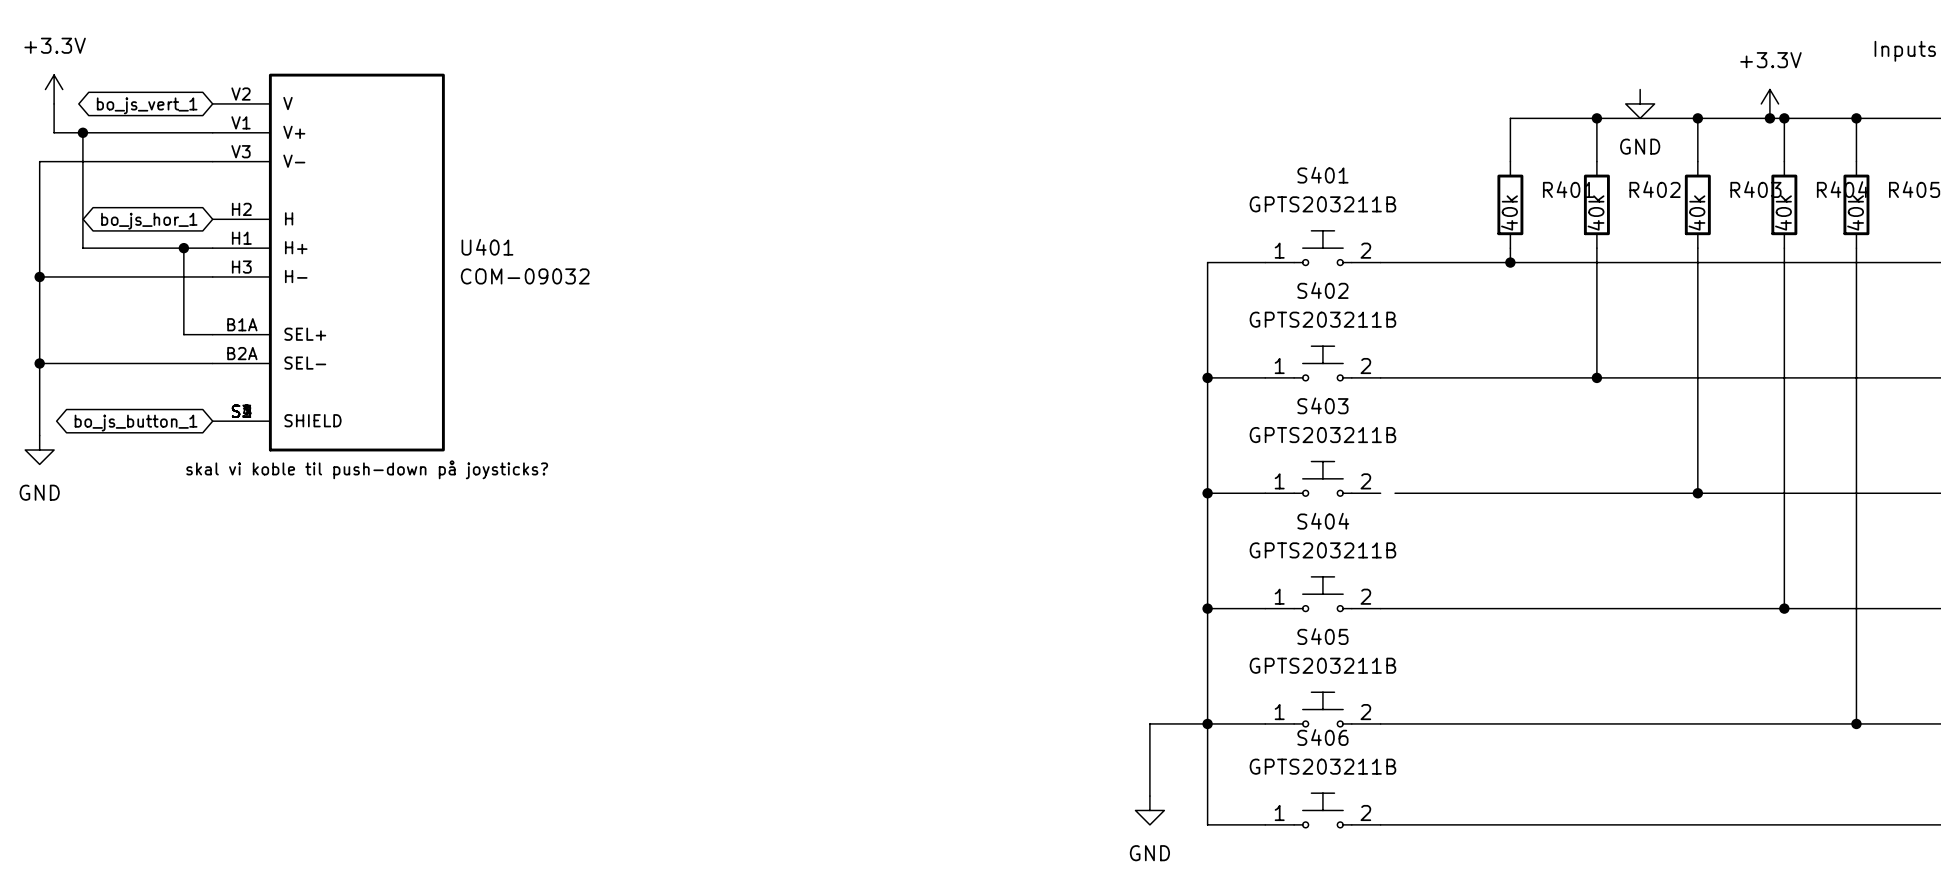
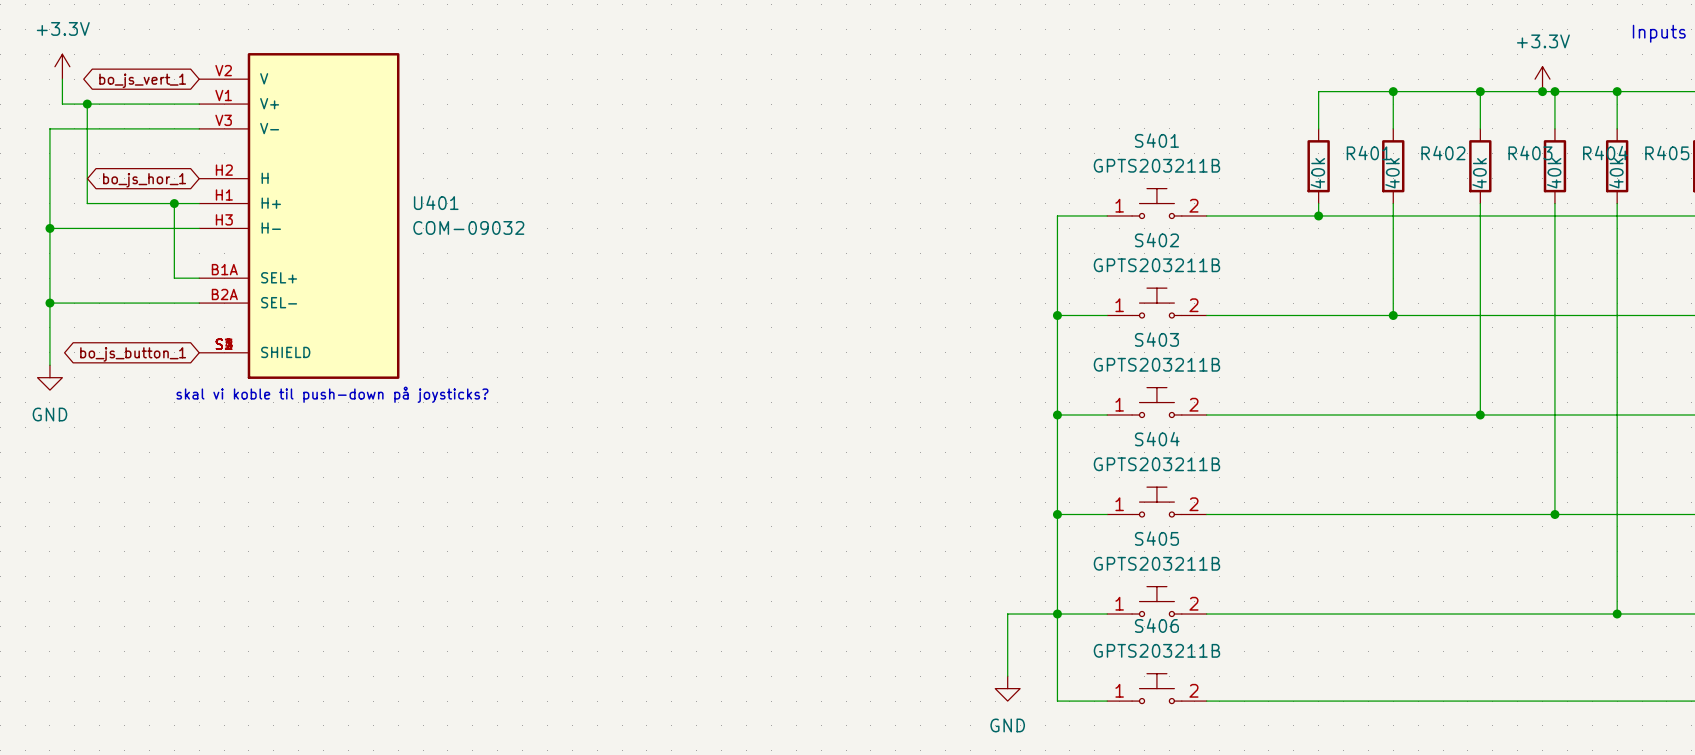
power symbol: GND (1640, 103) -> none
wire: none -> (1206, 414) (1219, 414)

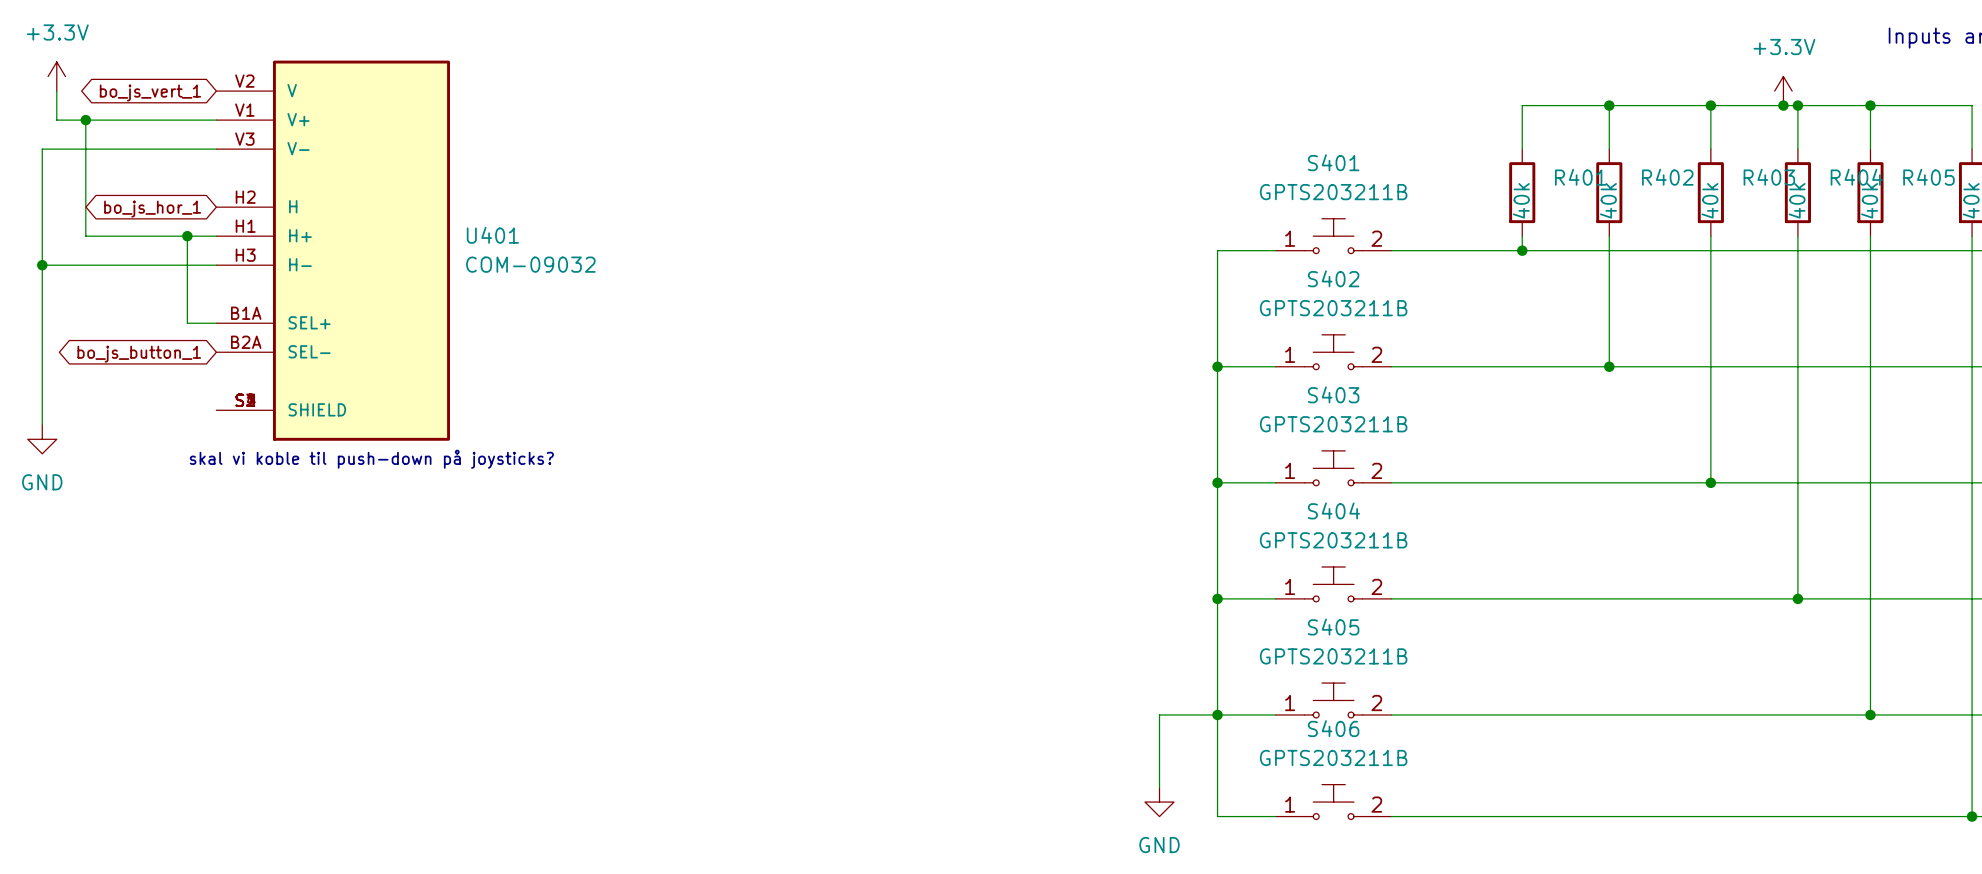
wire: (49, 303) (199, 303) -> none
junction: (49, 303) -> none
global label position: bo_js_button_1 (133, 354) -> bo_js_button_1 (139, 354)

